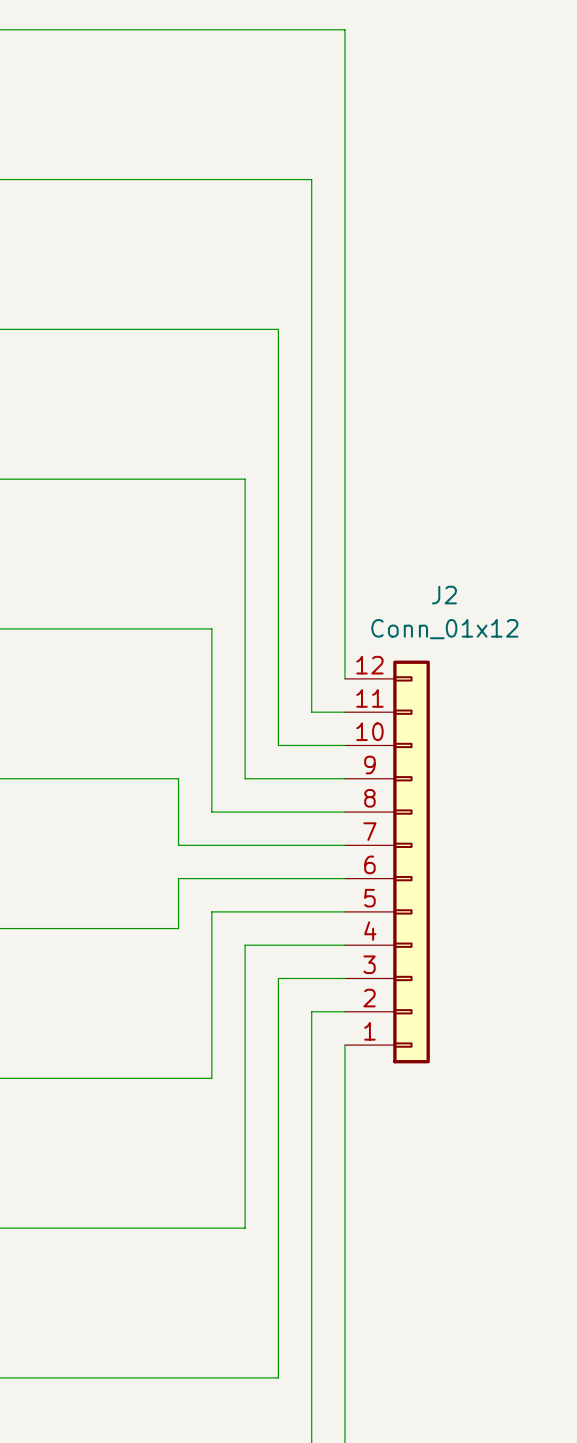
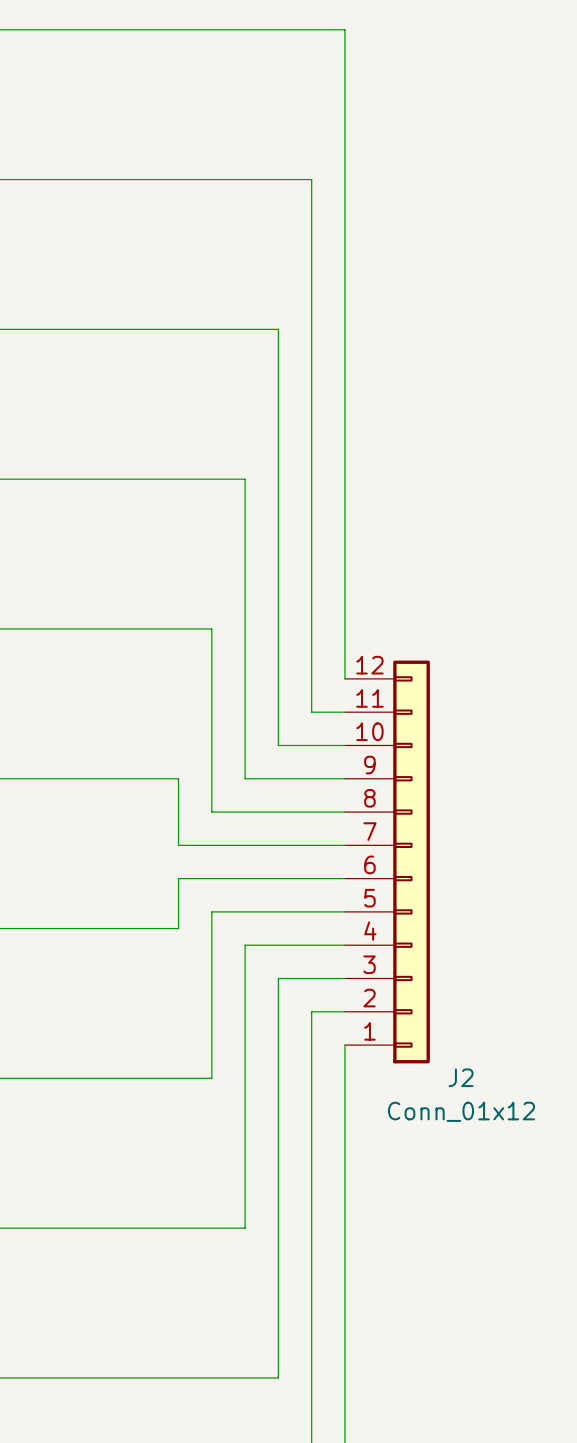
J2 name position: J2 (444, 595) -> J2 (461, 1077)
J2 value position: Conn_01x12 (444, 629) -> Conn_01x12 (461, 1111)

